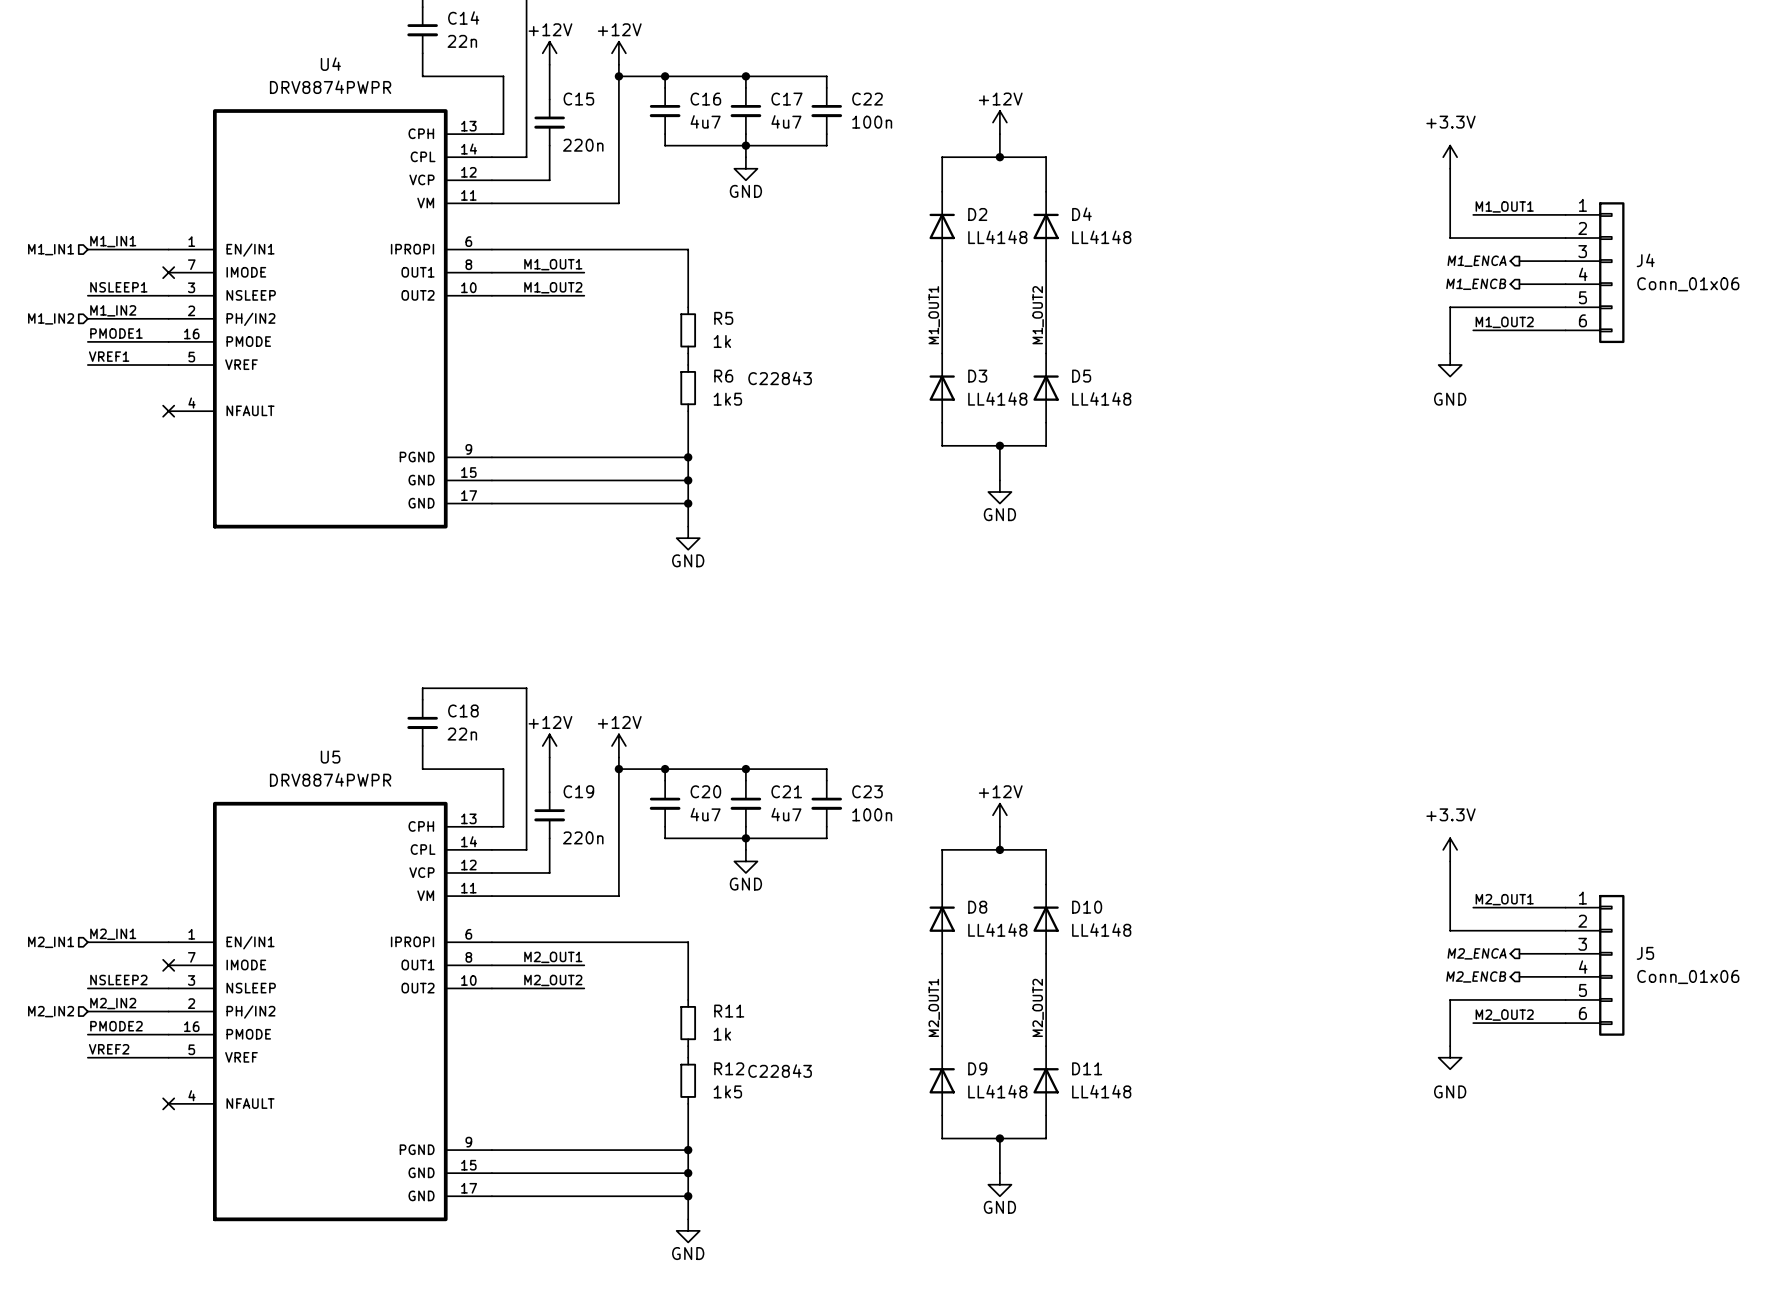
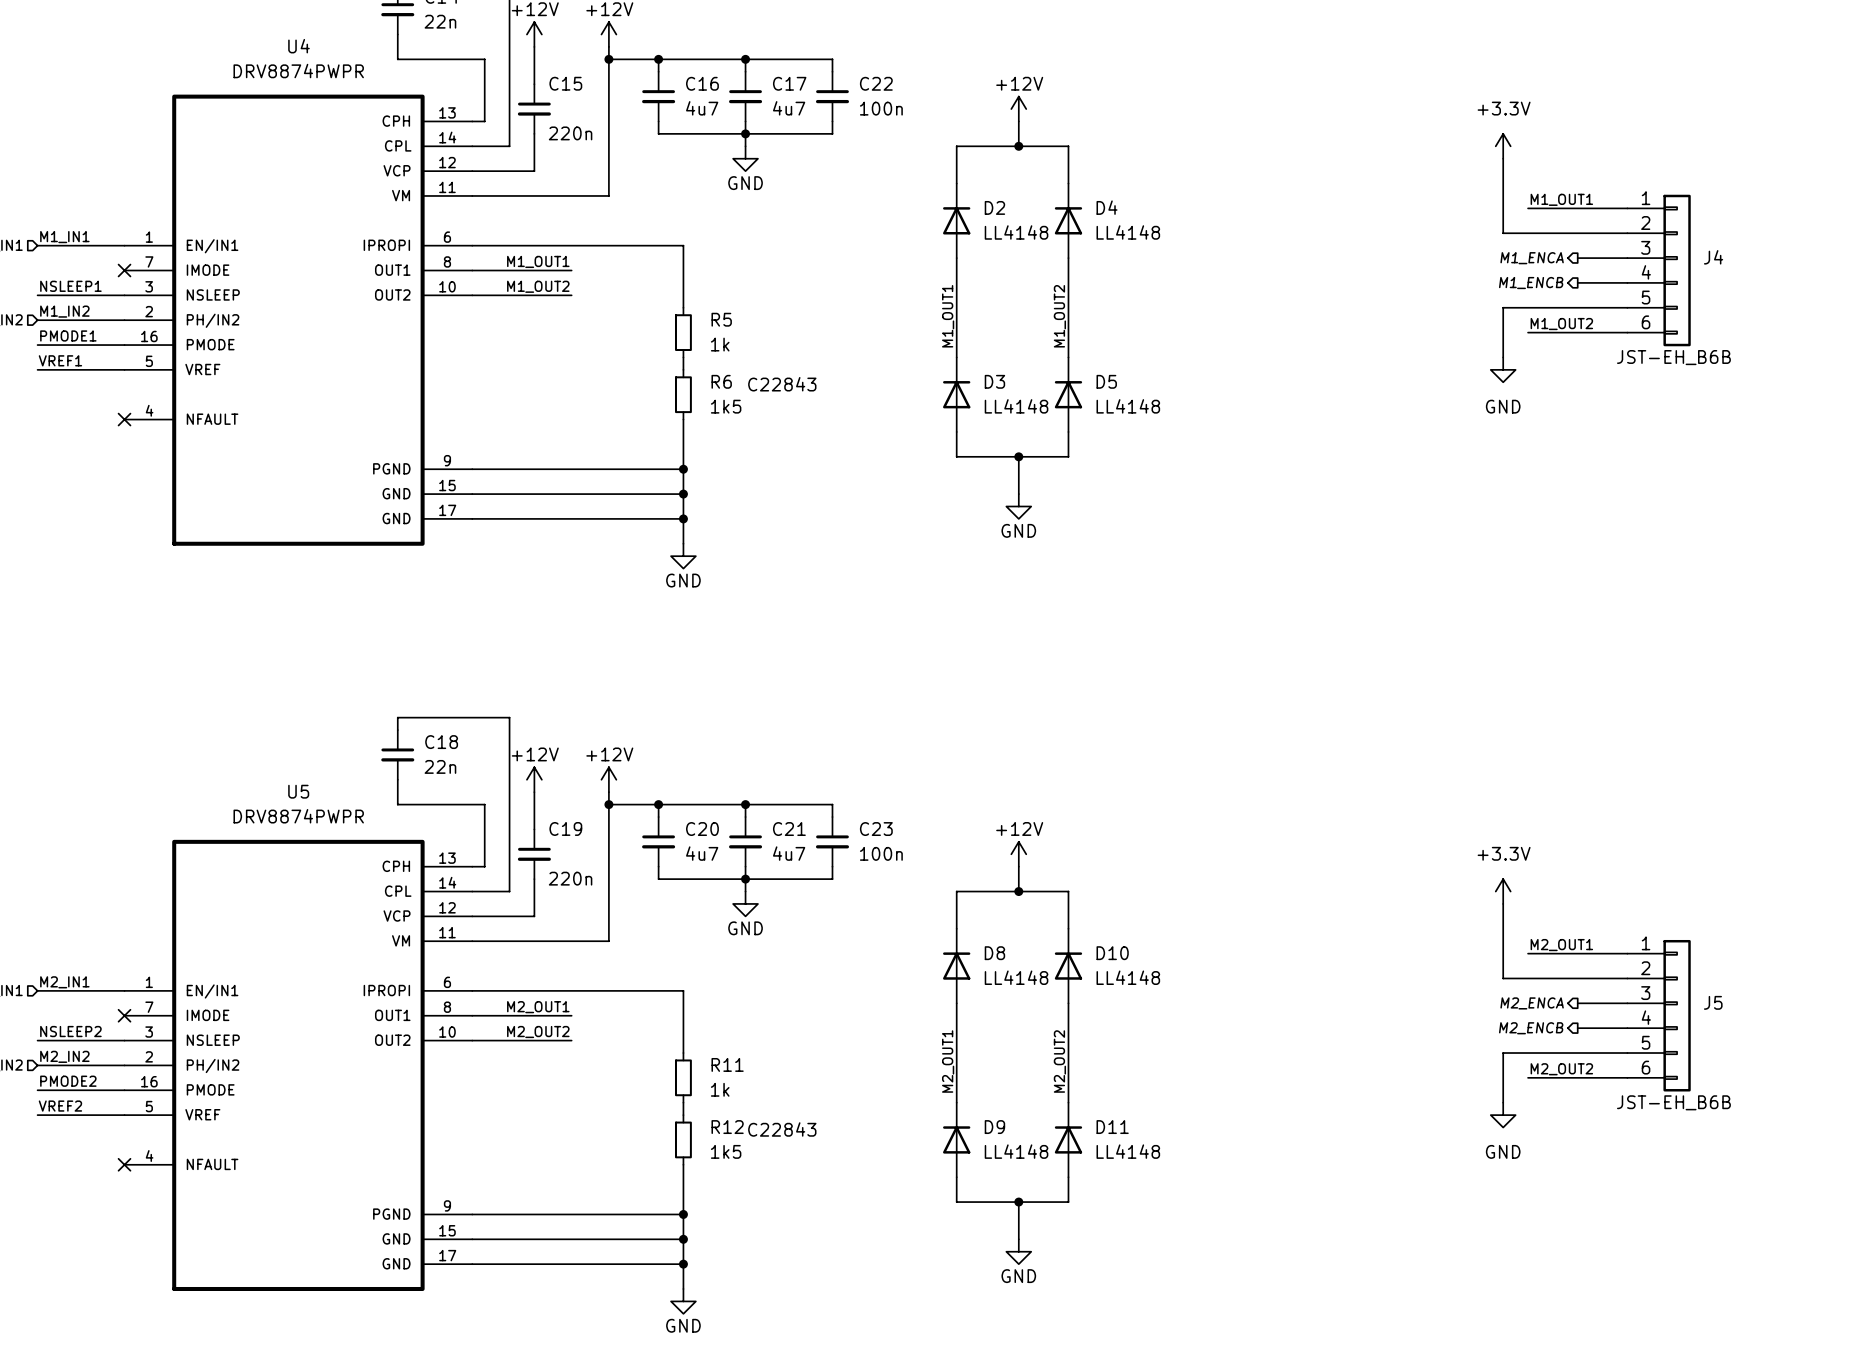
J4 value: Conn_01x06 (1688, 284) -> JST-EH_B6B (1673, 357)
J5 value: Conn_01x06 (1688, 977) -> JST-EH_B6B (1673, 1102)

